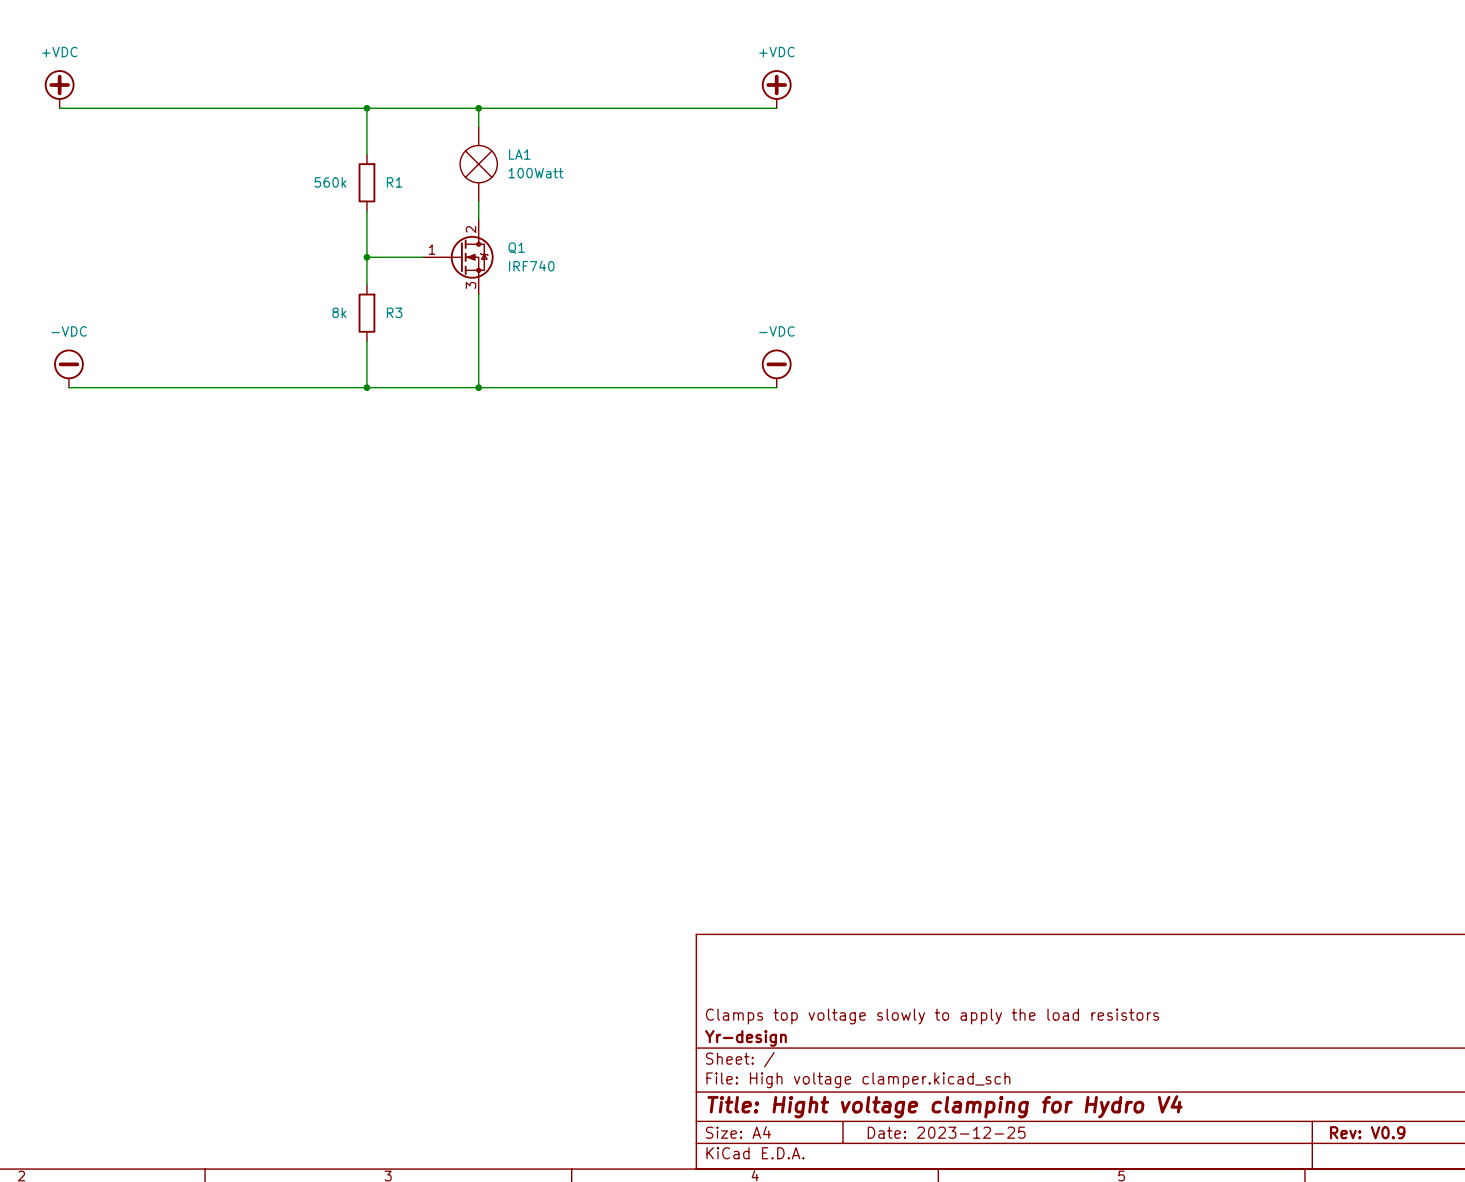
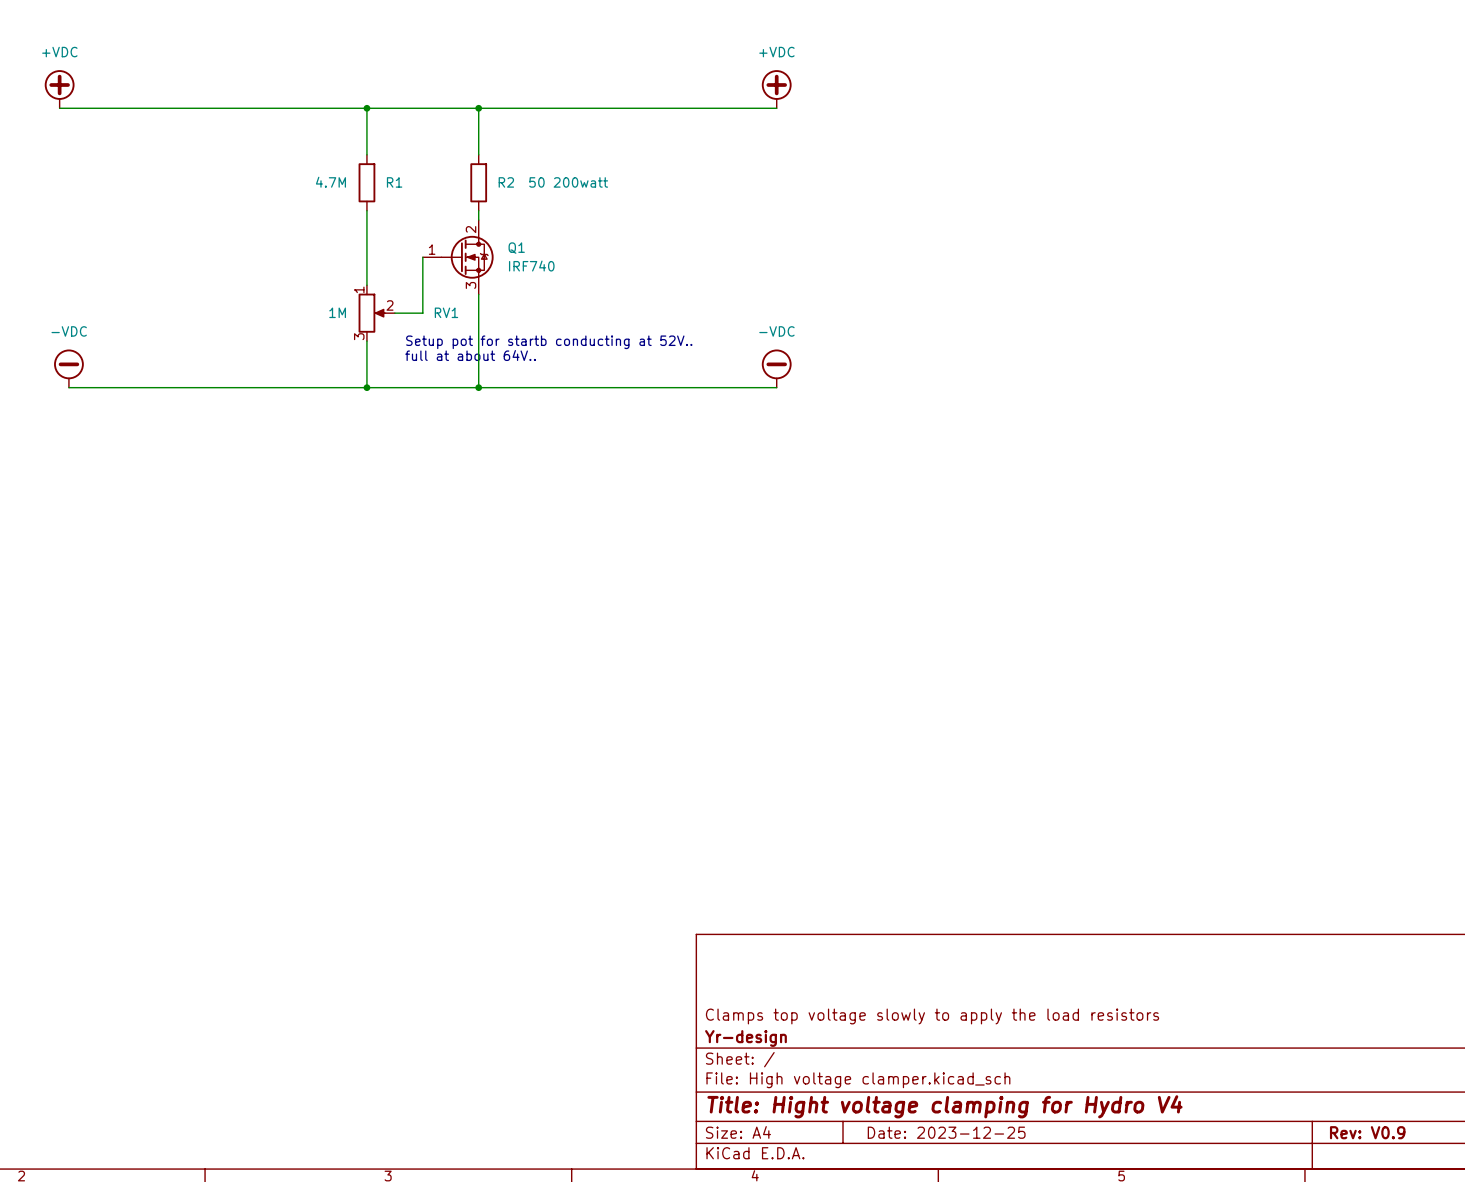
LA1: 100Watt (478, 164) -> none
R1 value: 560k (330, 182) -> 4.7M (330, 182)
R2: none -> 50 200watt (478, 182)
wire: (366, 257) (422, 257) -> (394, 313) (422, 313) (422, 257)
junction: (366, 257) -> none
R3: 8k (366, 313) -> none
RV1: none -> 1M (376, 313)
text: none -> Setup pot for startb conducting at 52V.. (549, 342)
text: none -> full at about 64V.. (470, 355)

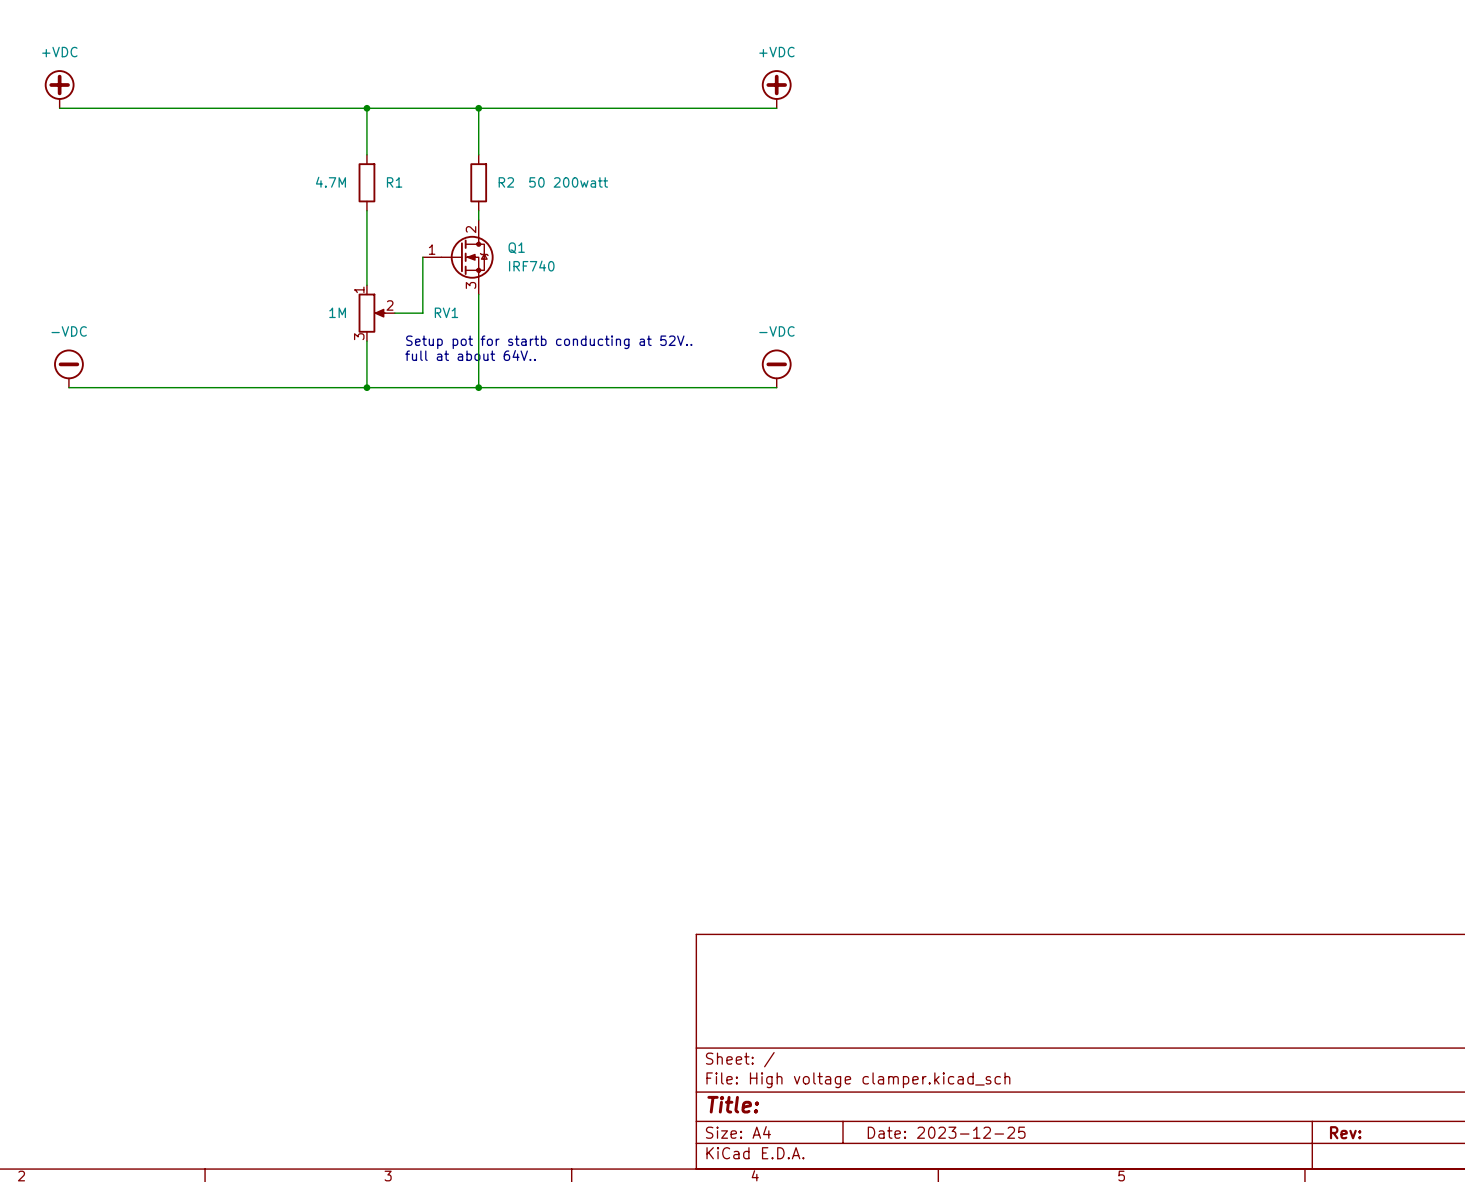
title block: Clamps top voltage slowly to apply the load resistors (932, 1016) -> none
title block: Yr-design (745, 1038) -> none
title block: Title: Hight voltage clamping for Hydro V4 (944, 1106) -> Title: (733, 1104)
title block: Rev: V0.9 (1367, 1132) -> Rev: (1345, 1132)

